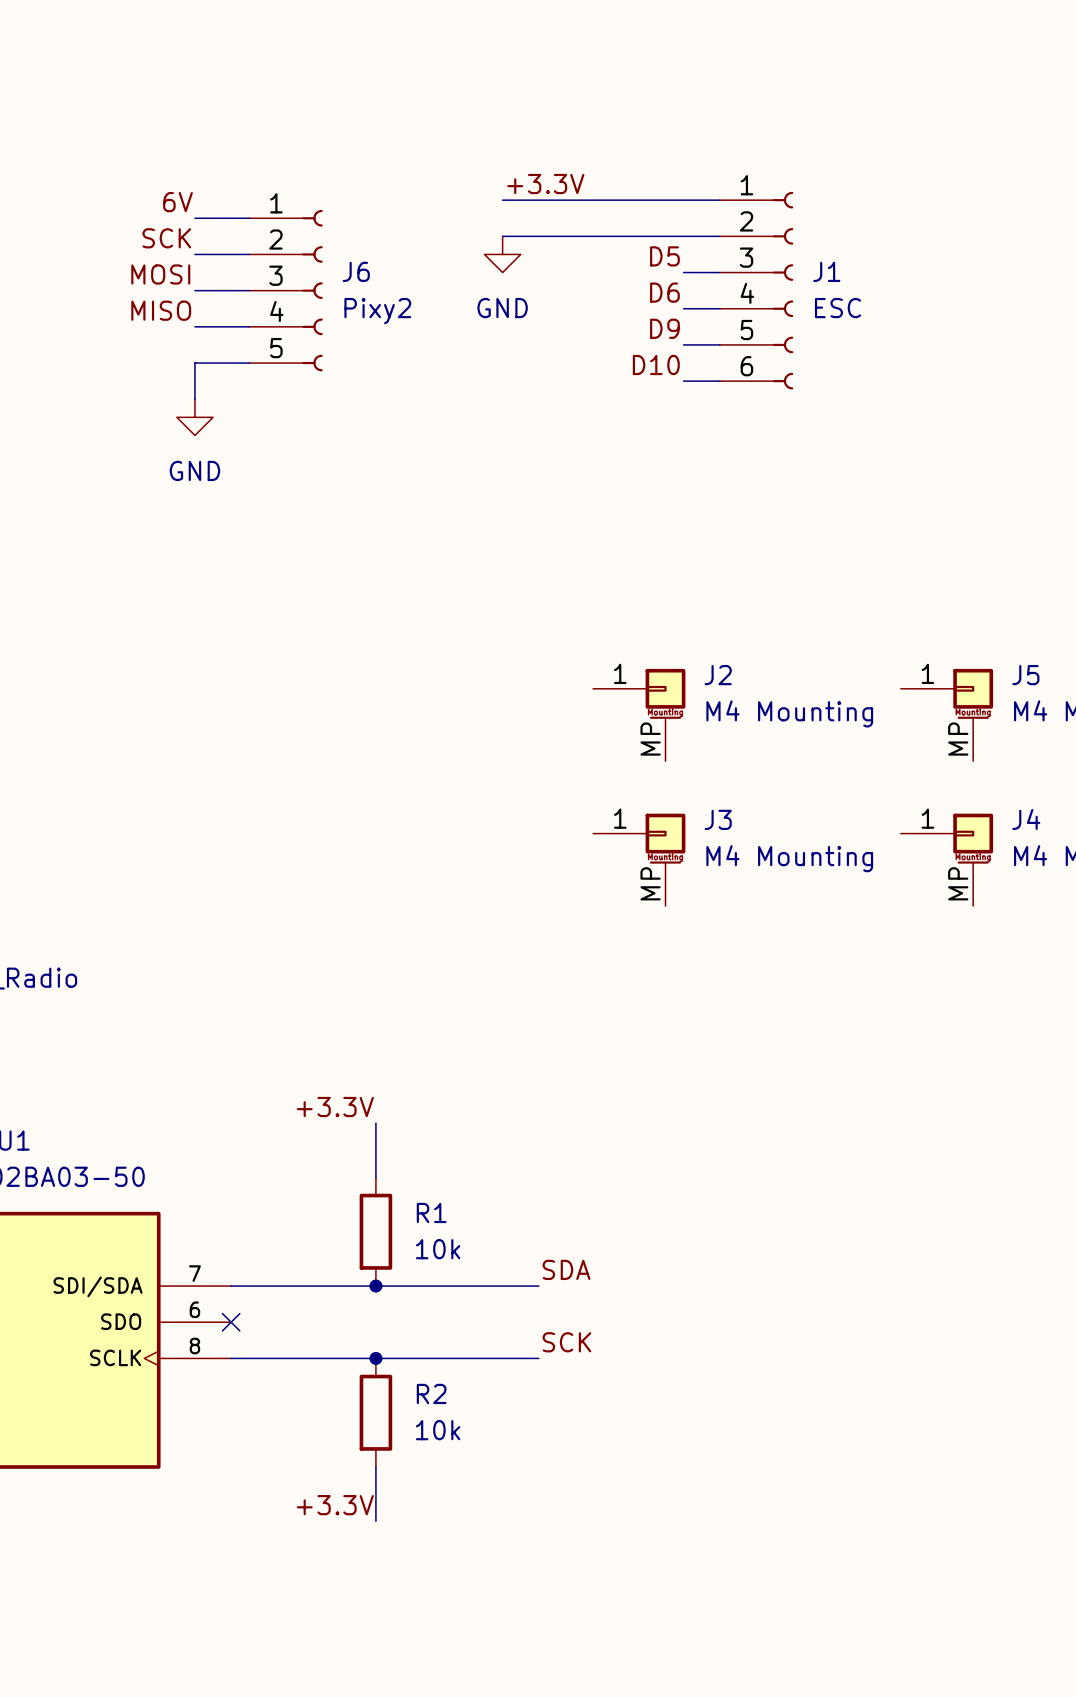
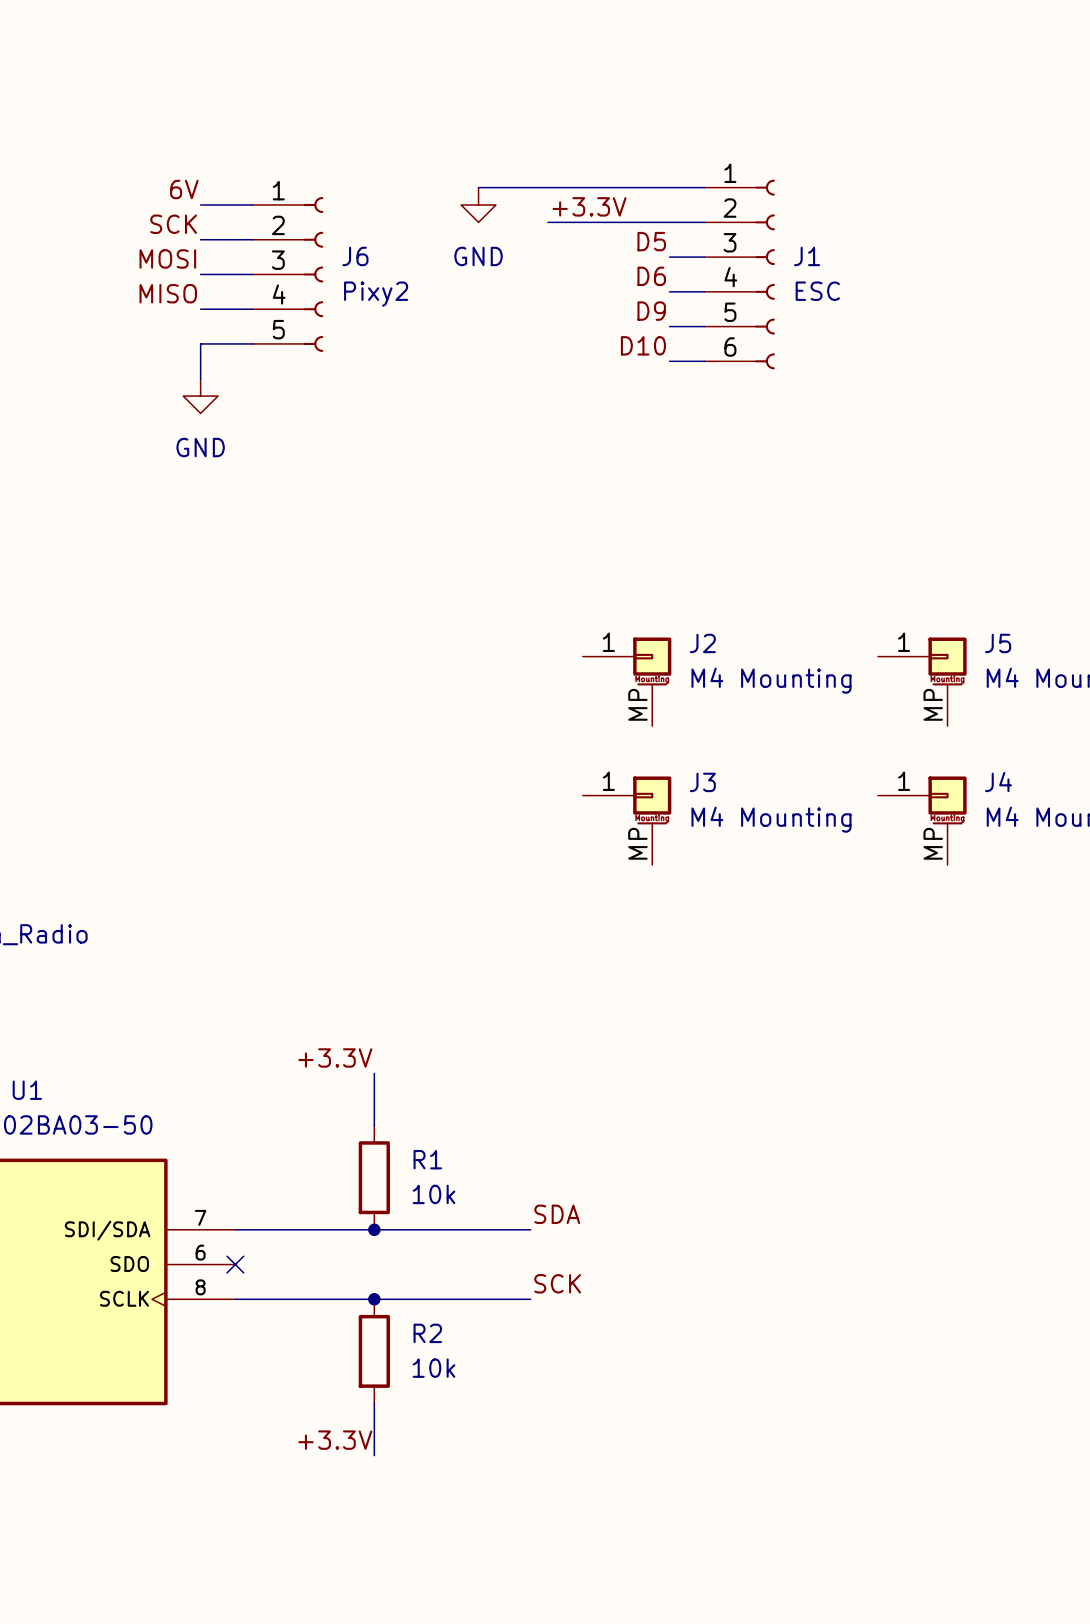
label position: +3.3V (545, 184) -> +3.3V (589, 206)
wire: none -> (478, 187) (495, 187)
wire: (502, 236) (556, 236) -> none
power symbol position: GND (502, 254) -> GND (478, 205)

